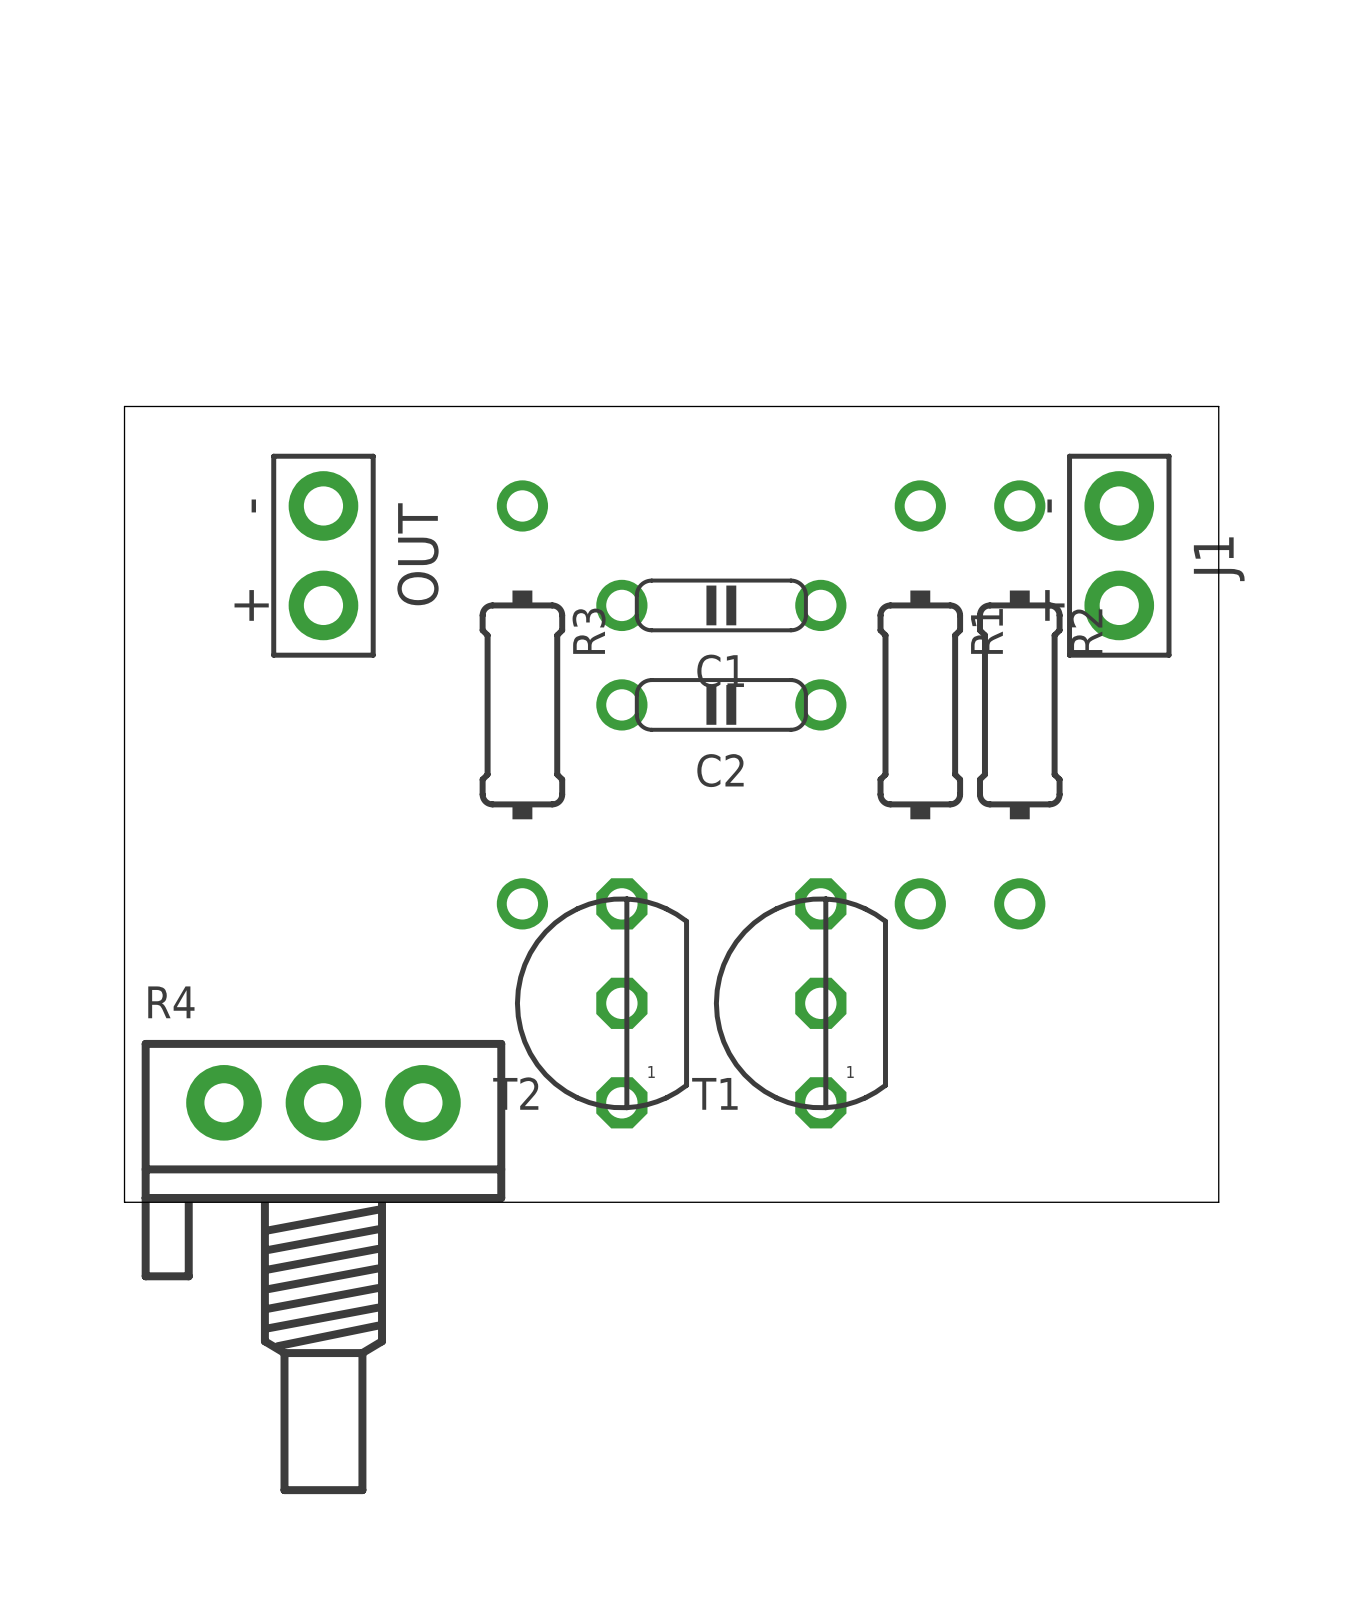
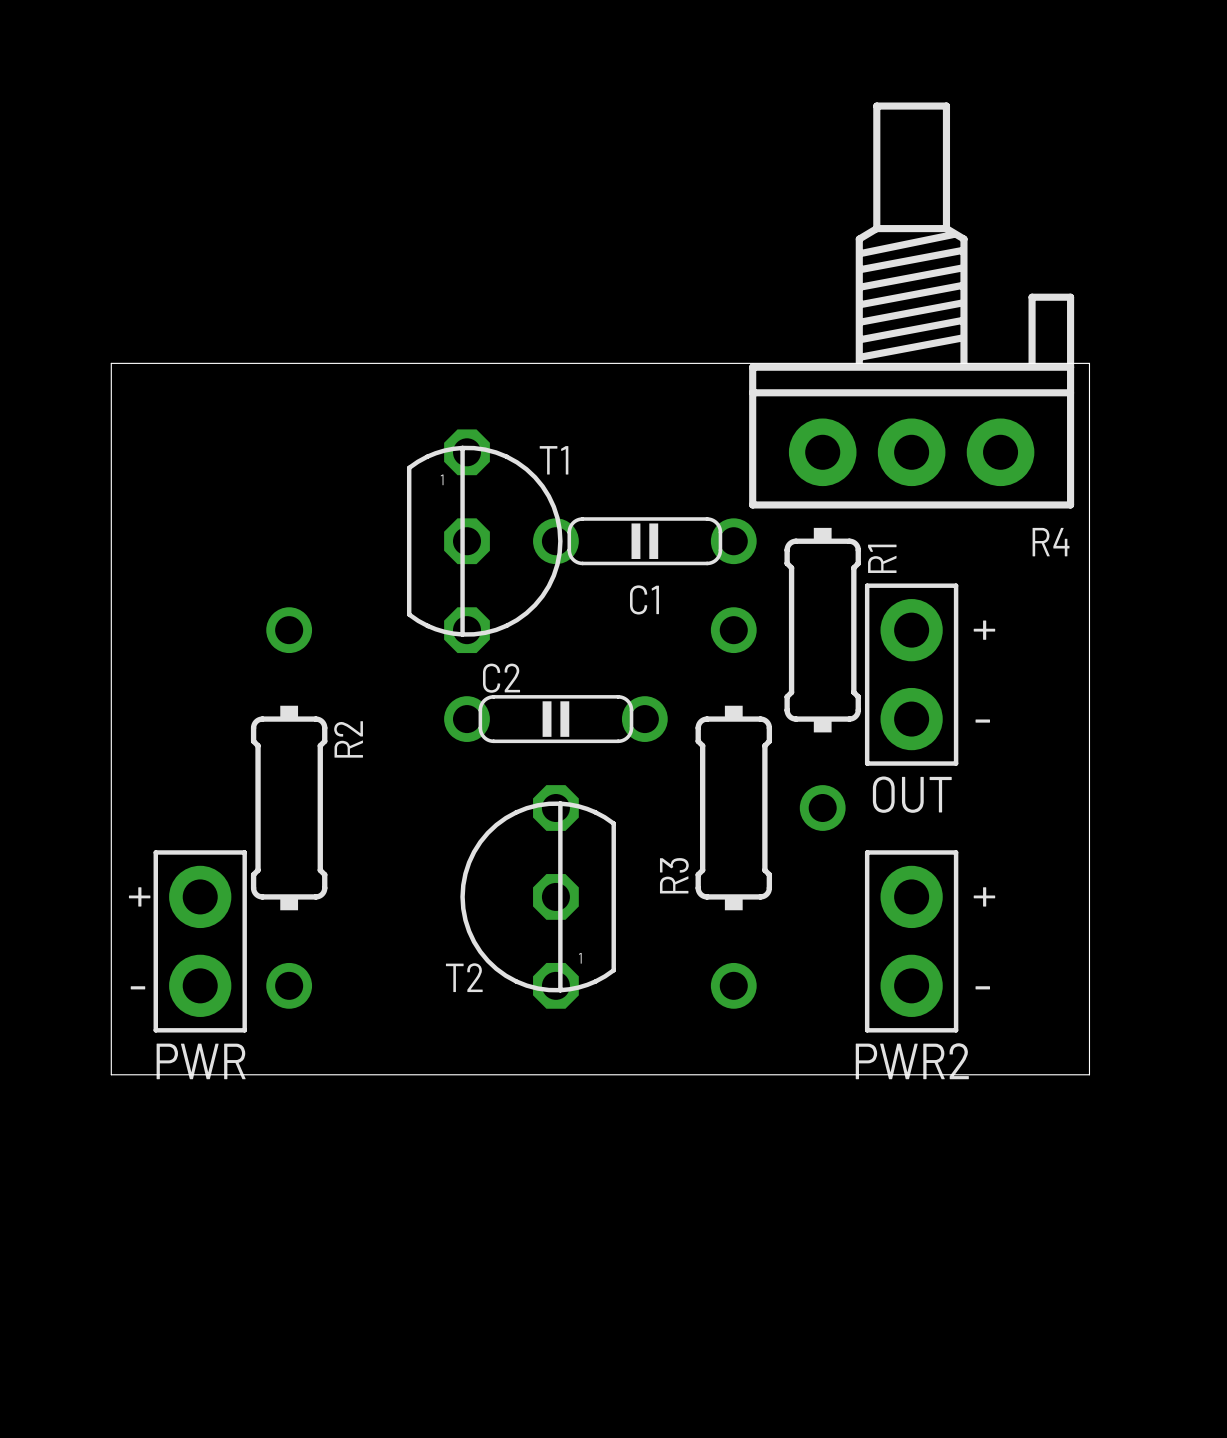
OUT: (323, 555) -> none
J1: (1119, 555) -> none
R3 name position: R3 (589, 631) -> R3 (674, 875)
R3 position: (522, 704) -> (733, 808)
C2 position: (721, 704) -> (555, 719)
R2 position: (1019, 704) -> (289, 808)
OUT: none -> (911, 674)
C2 name position: C2 (720, 770) -> C2 (501, 678)
T1 footprint: [713, 878, 888, 1129] -> [406, 429, 563, 654]
PWR: none -> (200, 941)
PWR2: none -> (911, 941)
T1 name position: T1 (714, 1093) -> T1 (554, 460)
R4 rotation: 0° (323, 1267) -> 180° (911, 305)
R4 position: (323, 1267) -> (911, 305)

